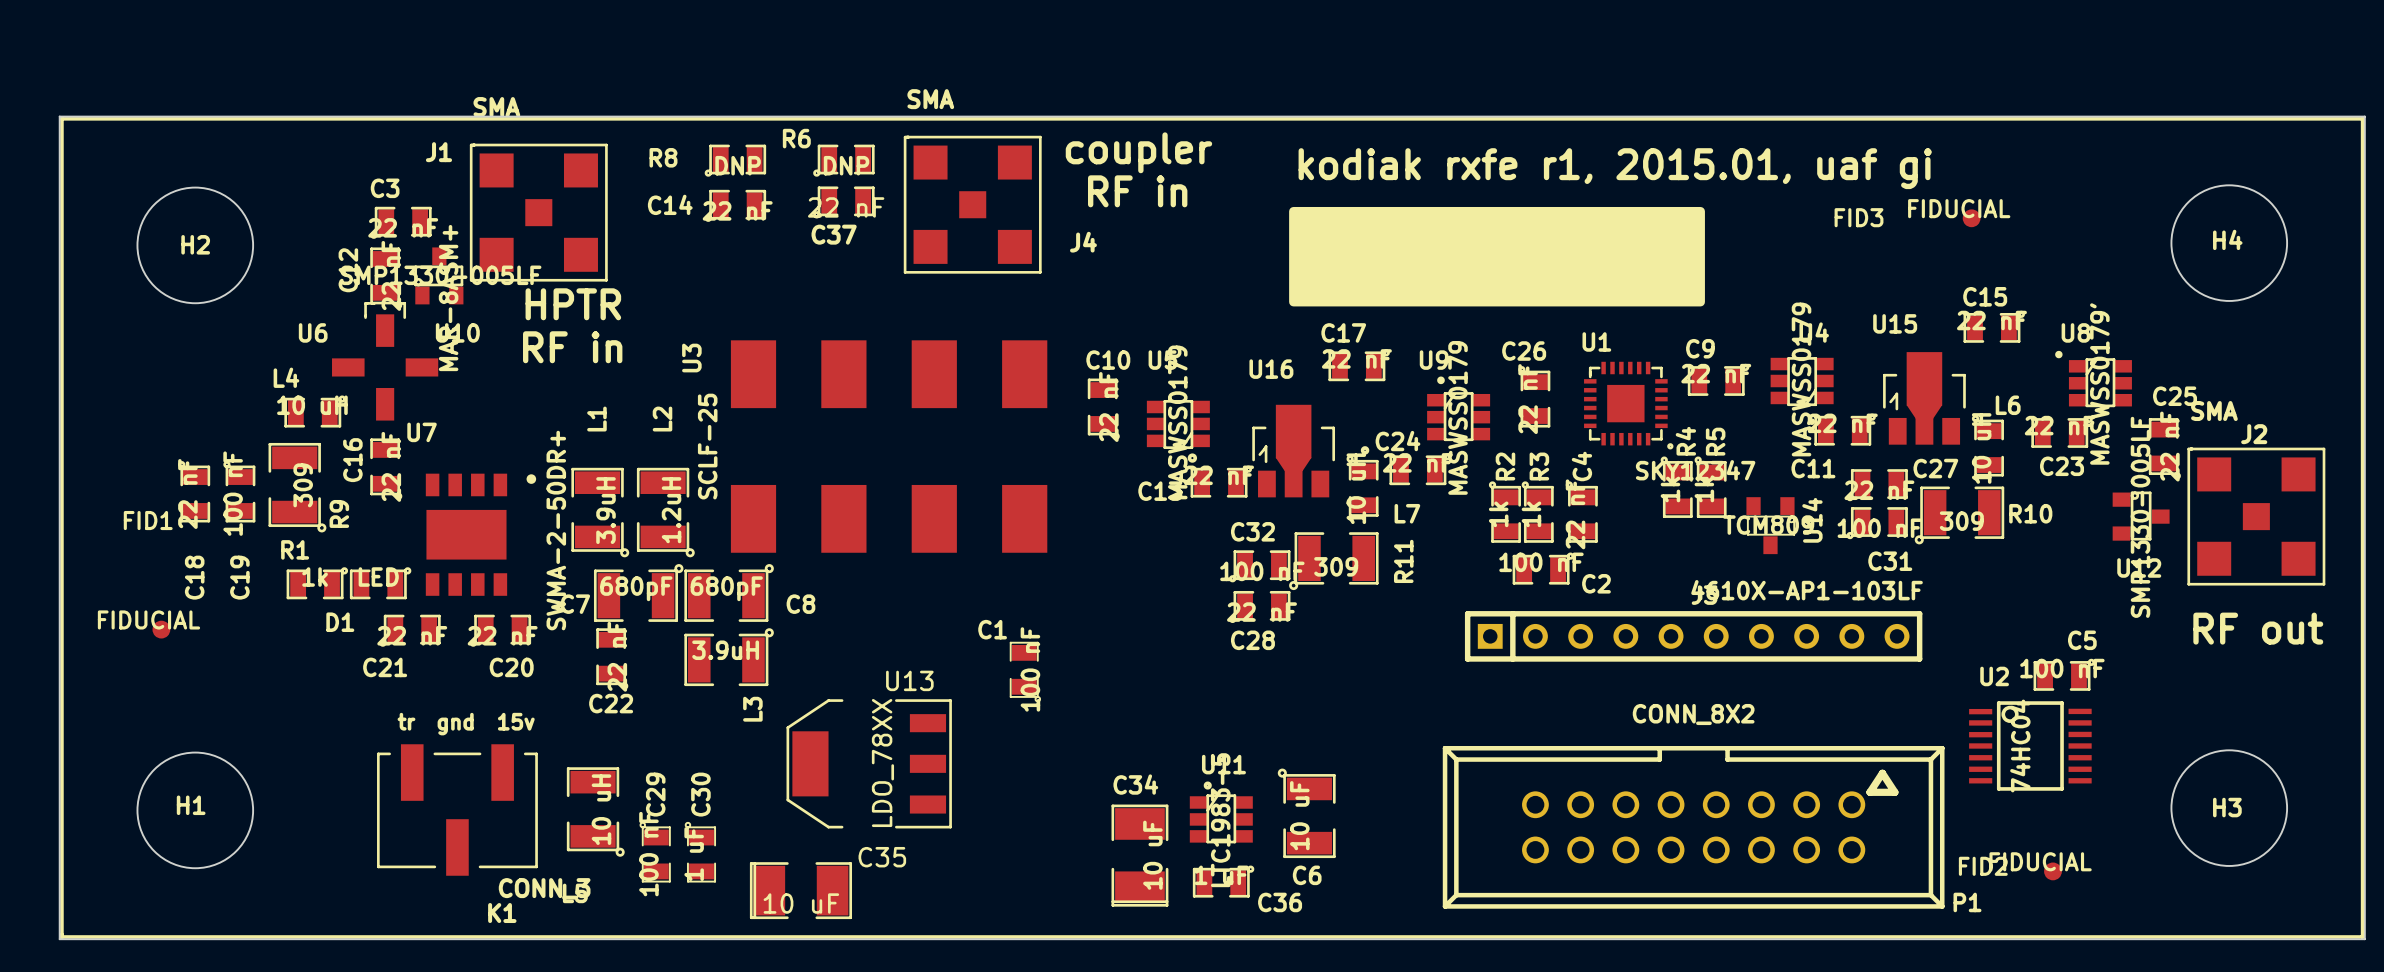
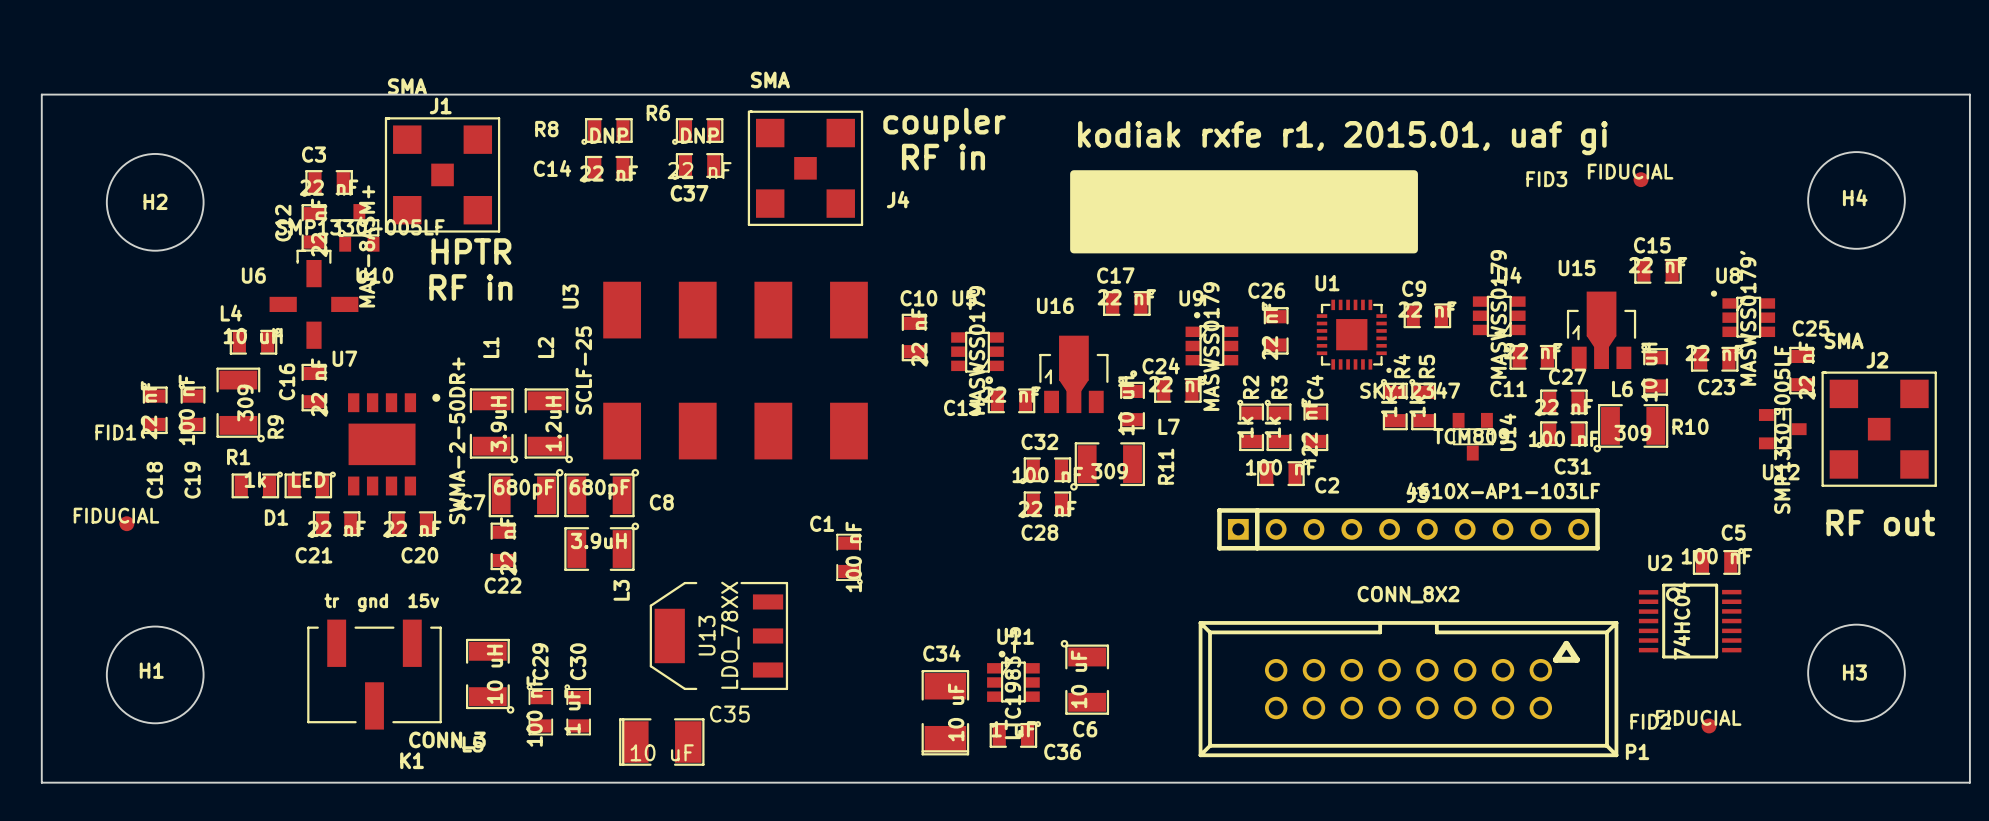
line: (61, 118) (61, 936) (2362, 936) (2362, 118) (61, 118) -> none
J1 name position: J1 (438, 152) -> J1 (440, 105)
L6 name position: L6 (2008, 405) -> L6 (1622, 388)
C27 name position: C27 (1935, 468) -> C27 (1567, 376)
U13 name rotation: 0° (909, 680) -> 90° counterclockwise (707, 635)
U13 name position: U13 (909, 680) -> U13 (707, 635)

